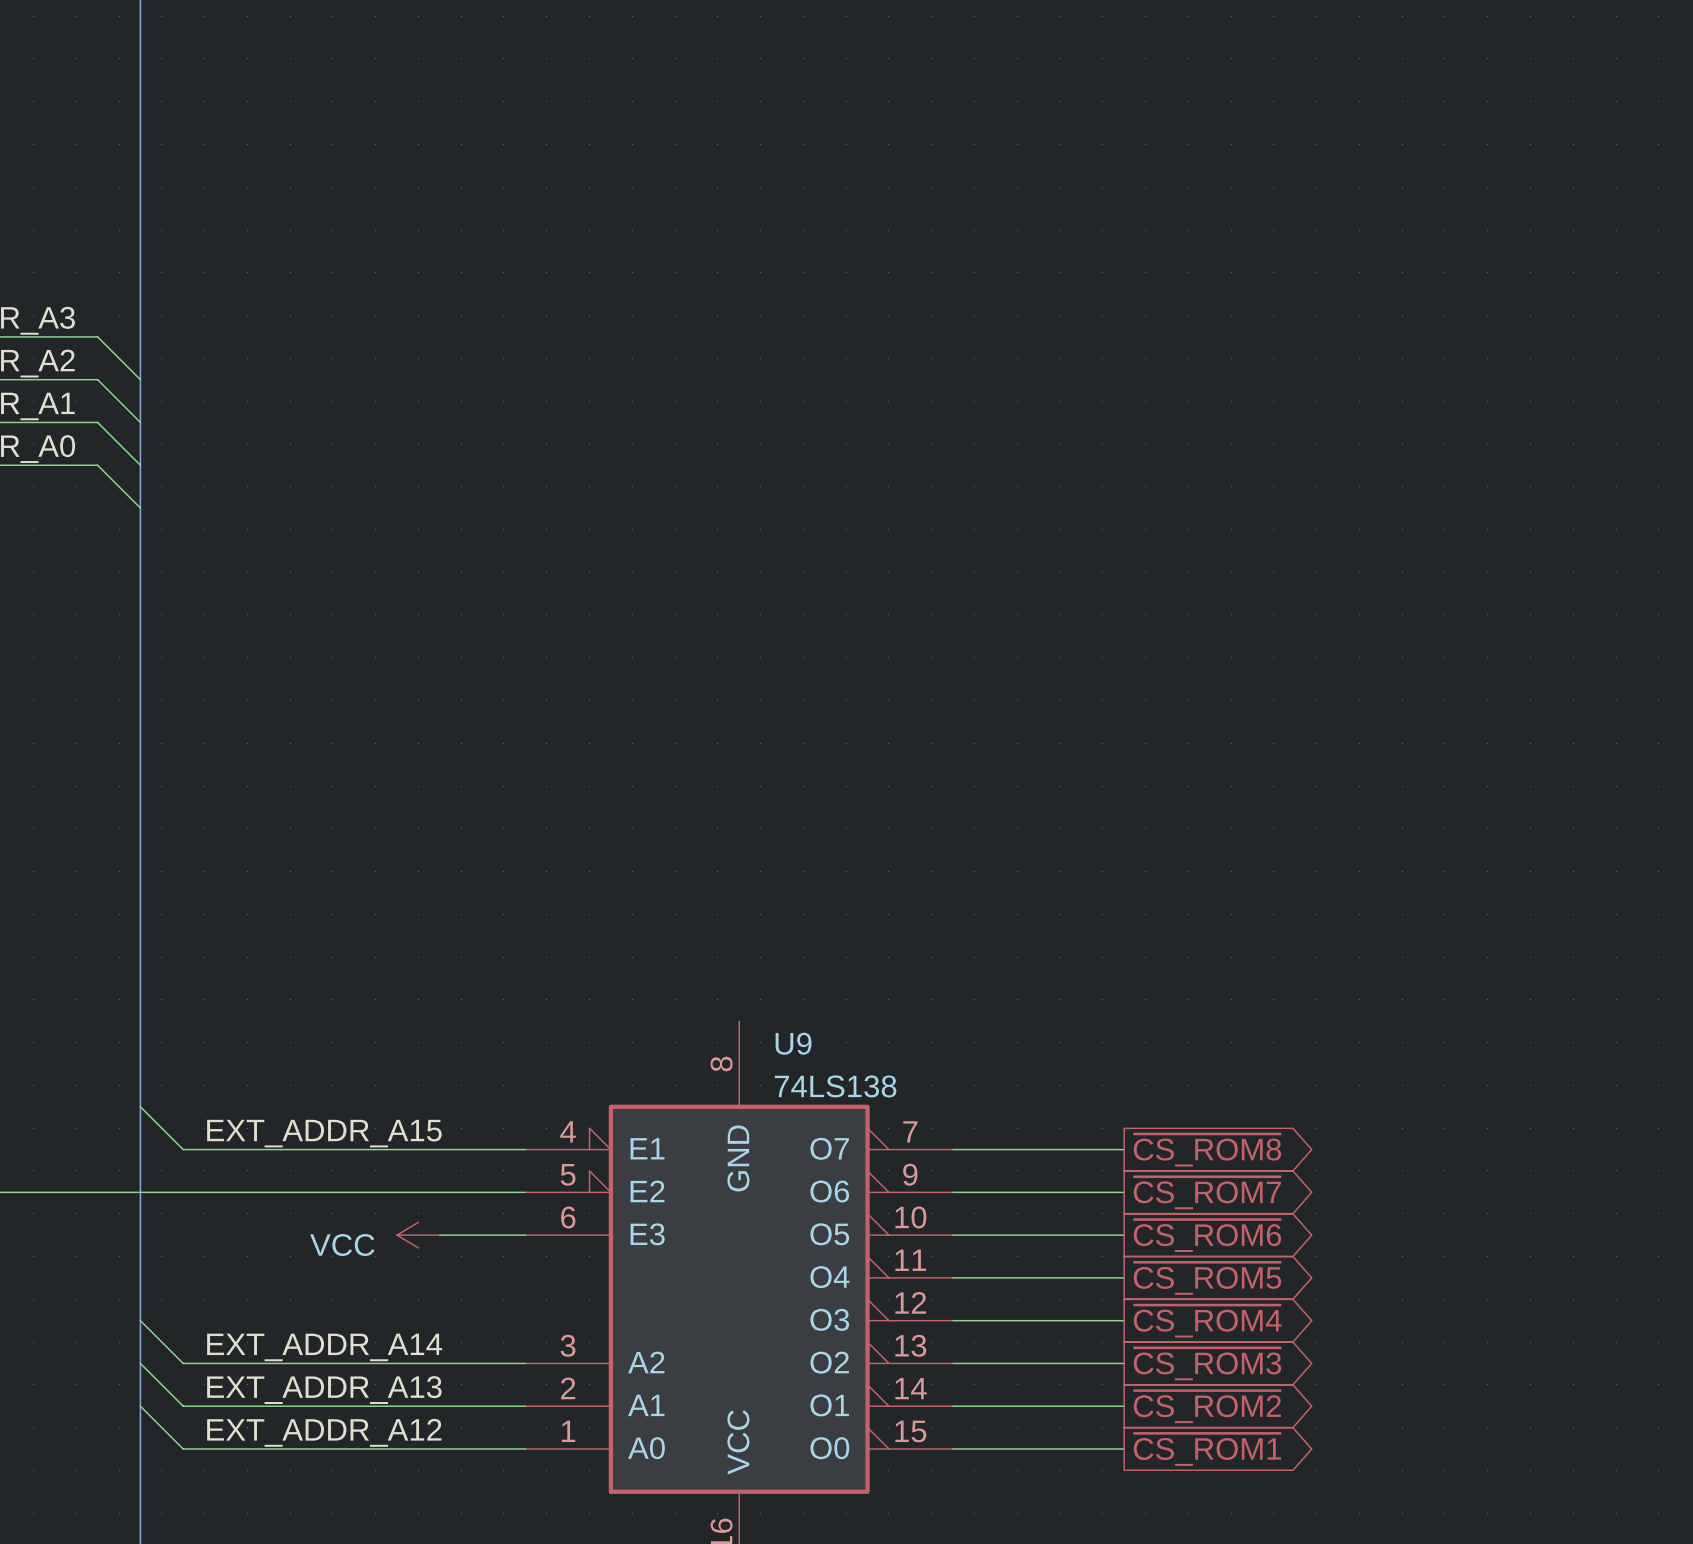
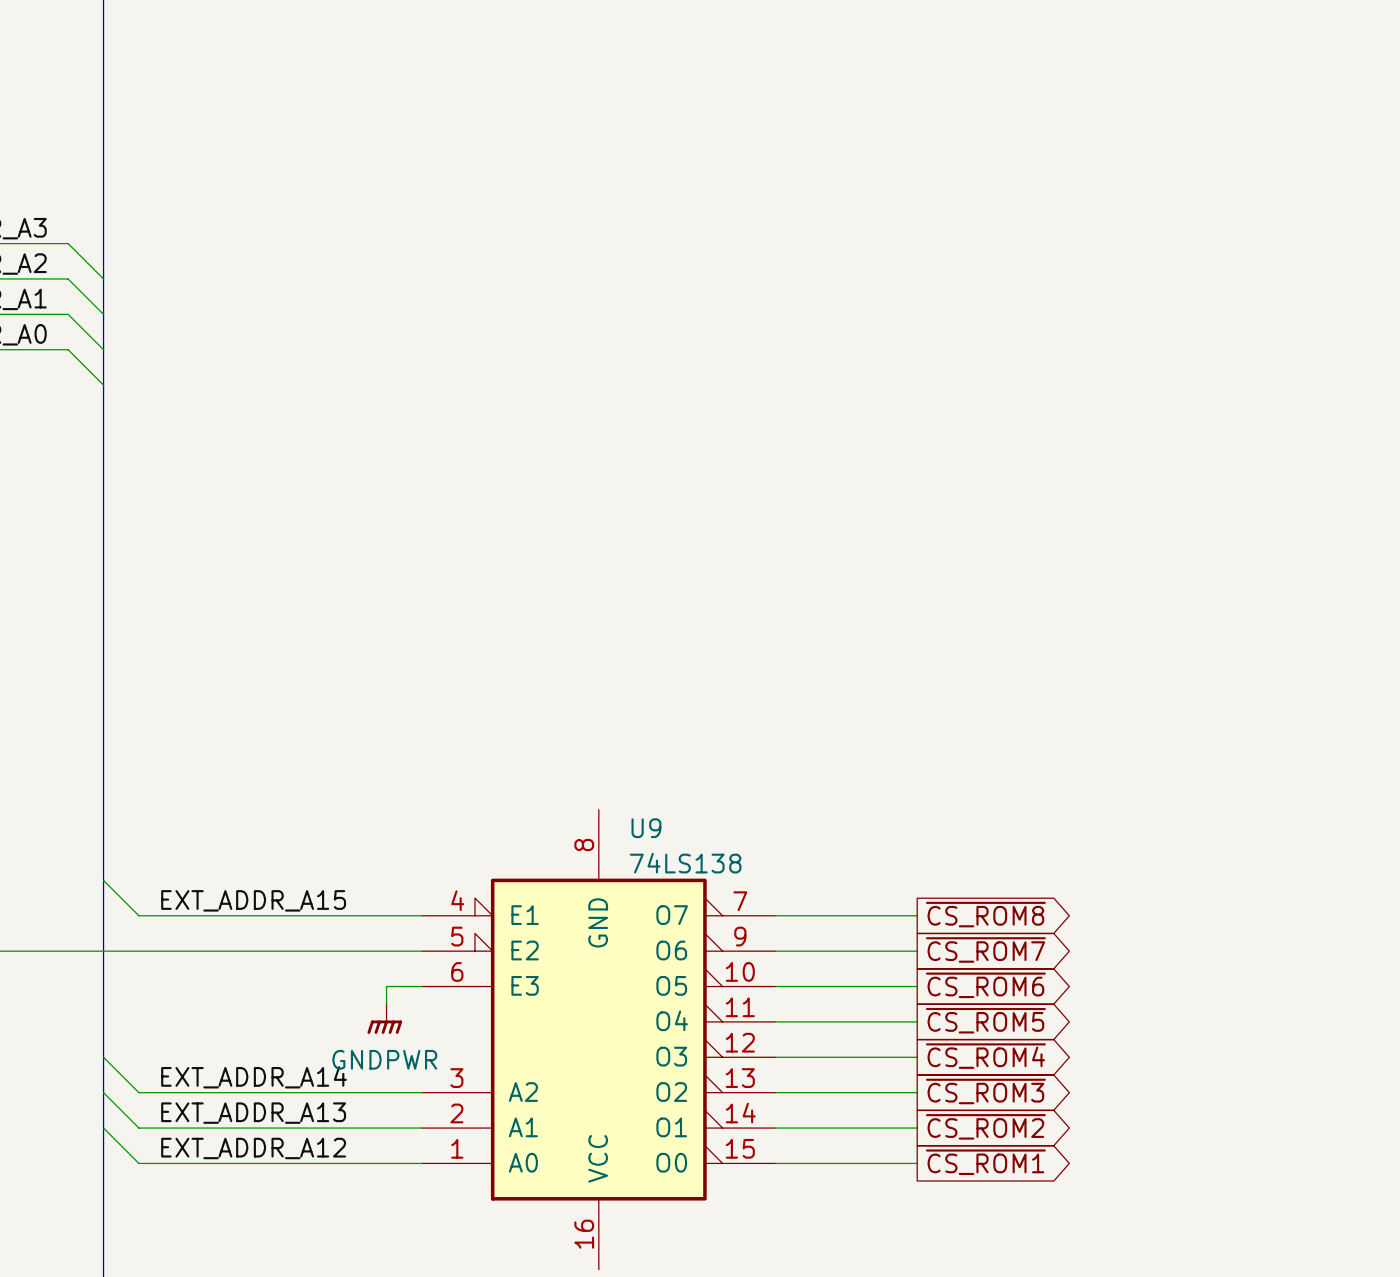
power symbol: VCC (418, 1235) -> none
wire: (439, 1235) (482, 1235) -> (386, 1004) (386, 986)
power symbol: none -> GNDPWR (384, 1019)

